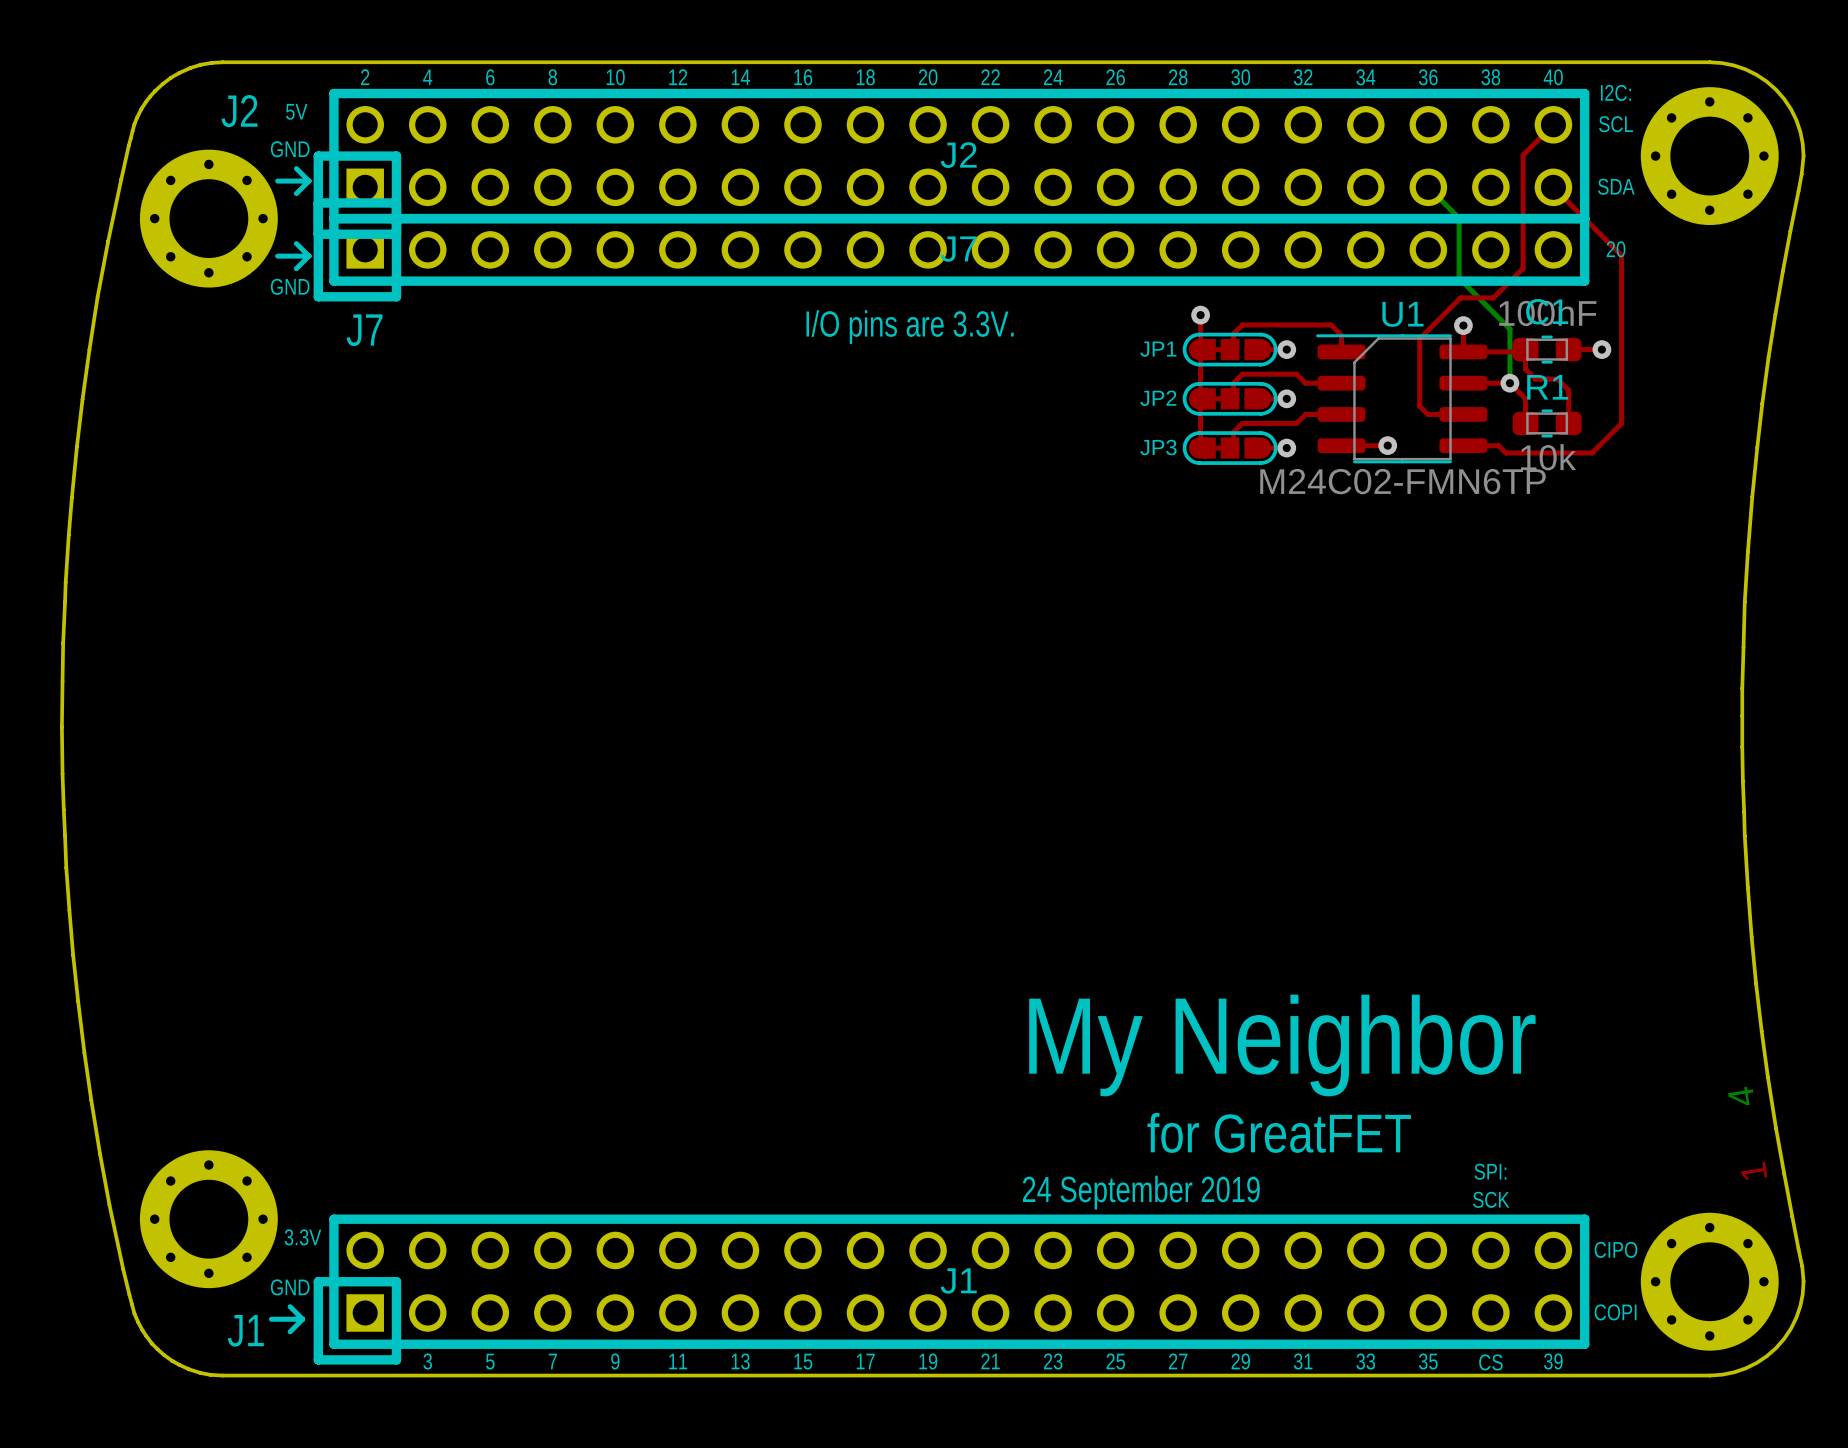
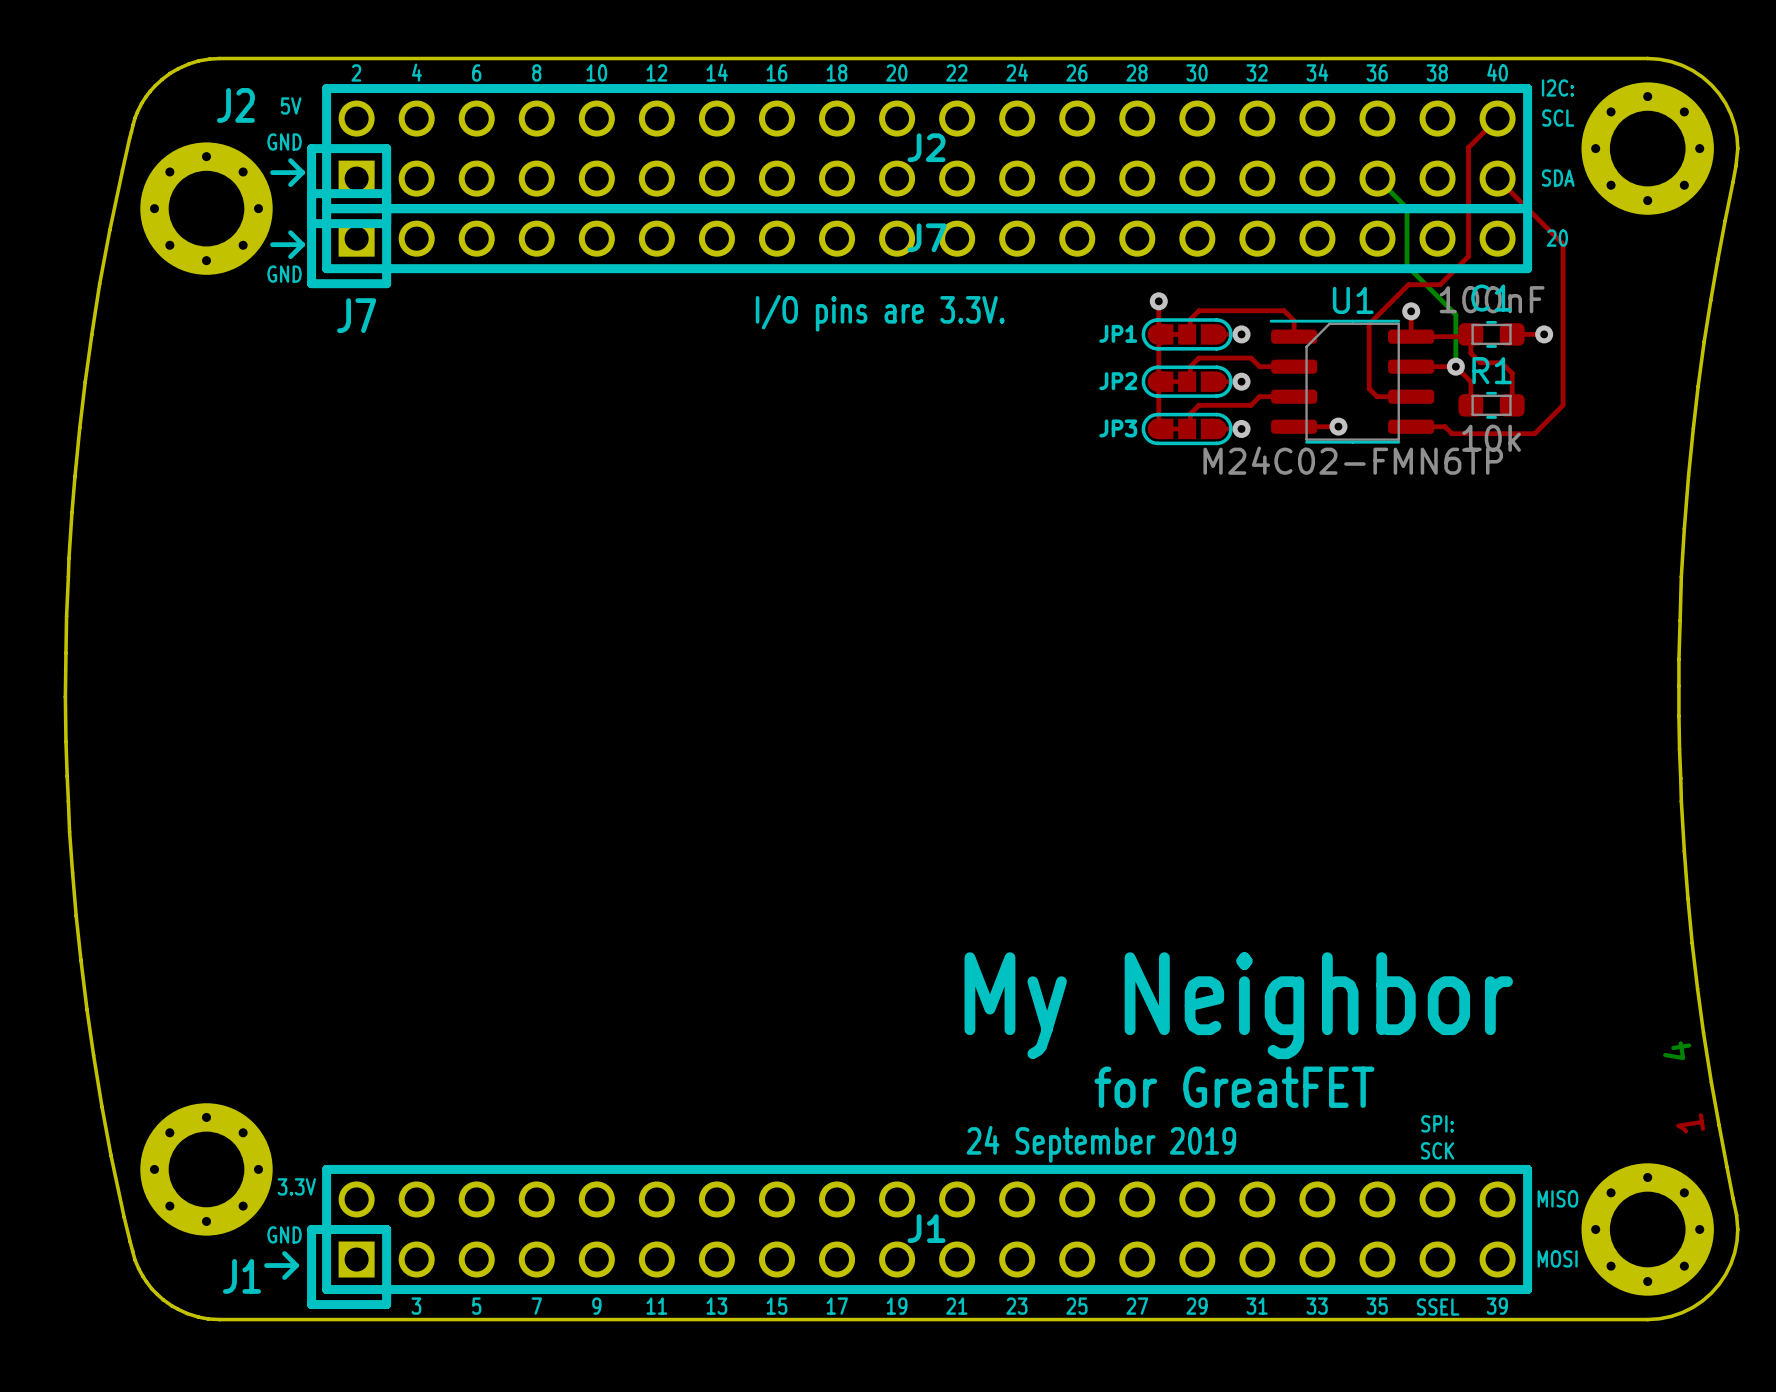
text: CIPO (1615, 1249) -> MISO (1557, 1198)
text: COPI (1615, 1312) -> MOSI (1557, 1258)
text: CS (1490, 1362) -> SSEL (1438, 1307)

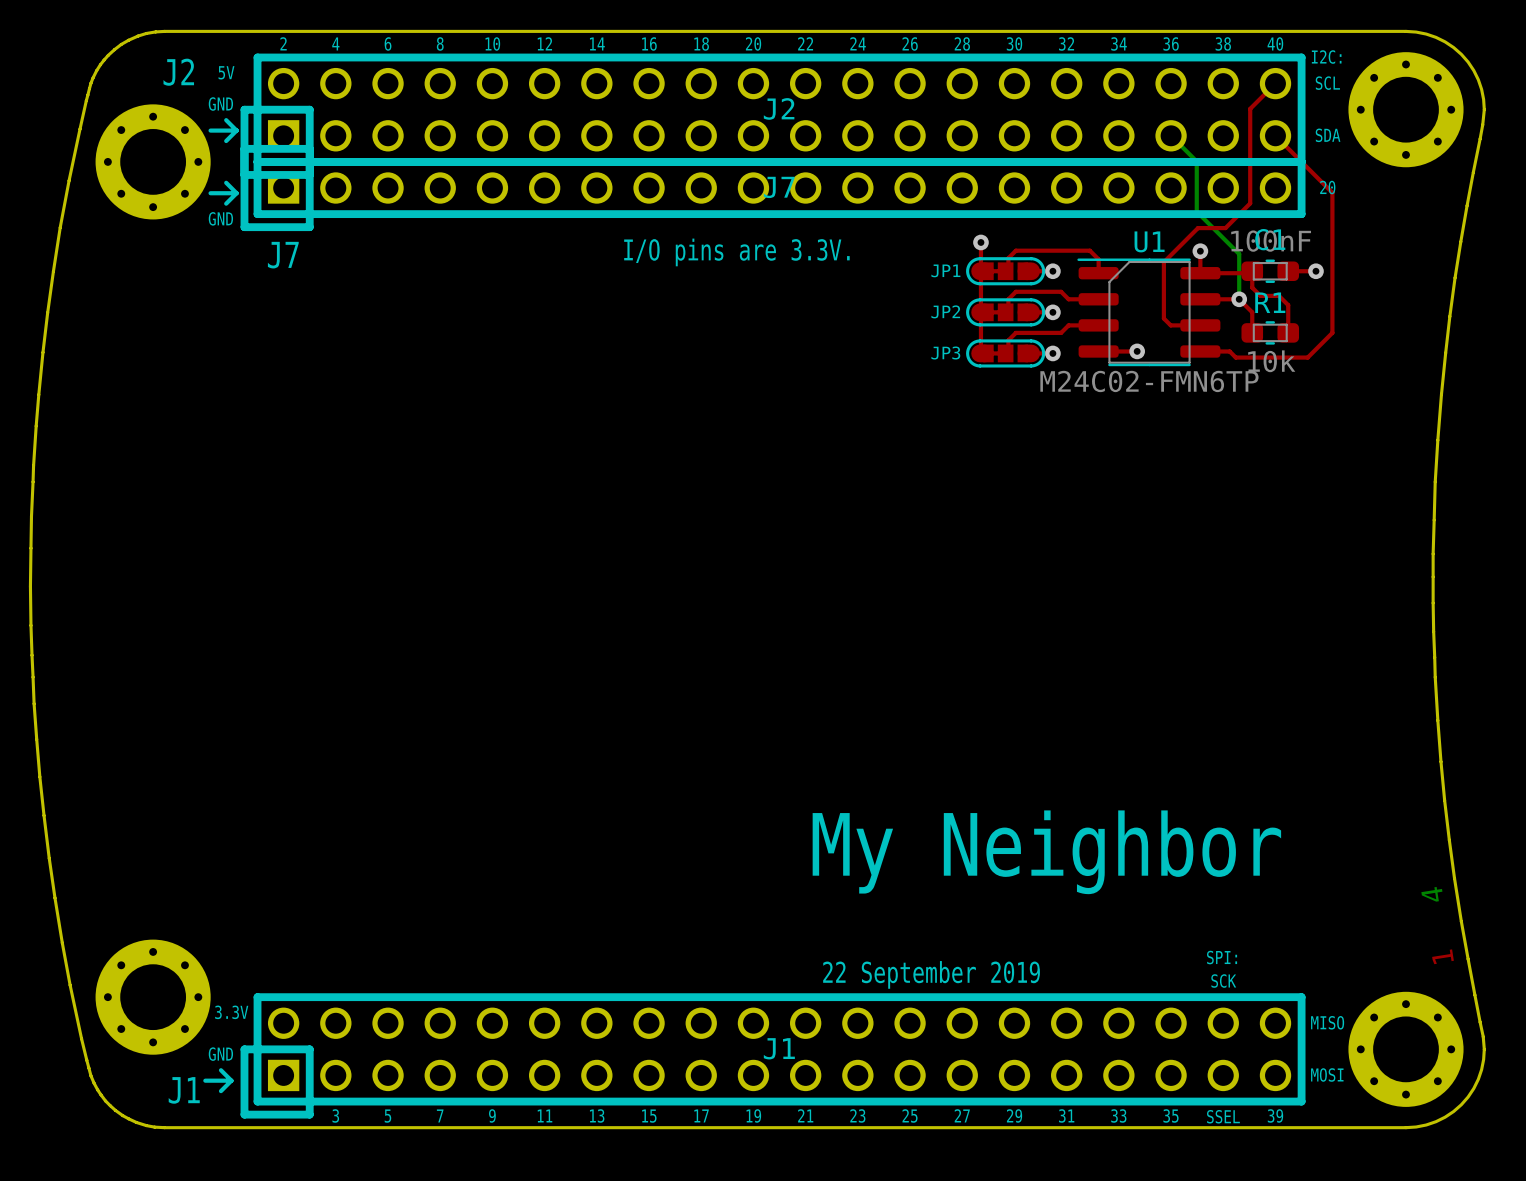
text: for GreatFET (1234, 1087) -> none
text: 24 September 2019 (1101, 1144) -> 22 September 2019 (931, 974)

